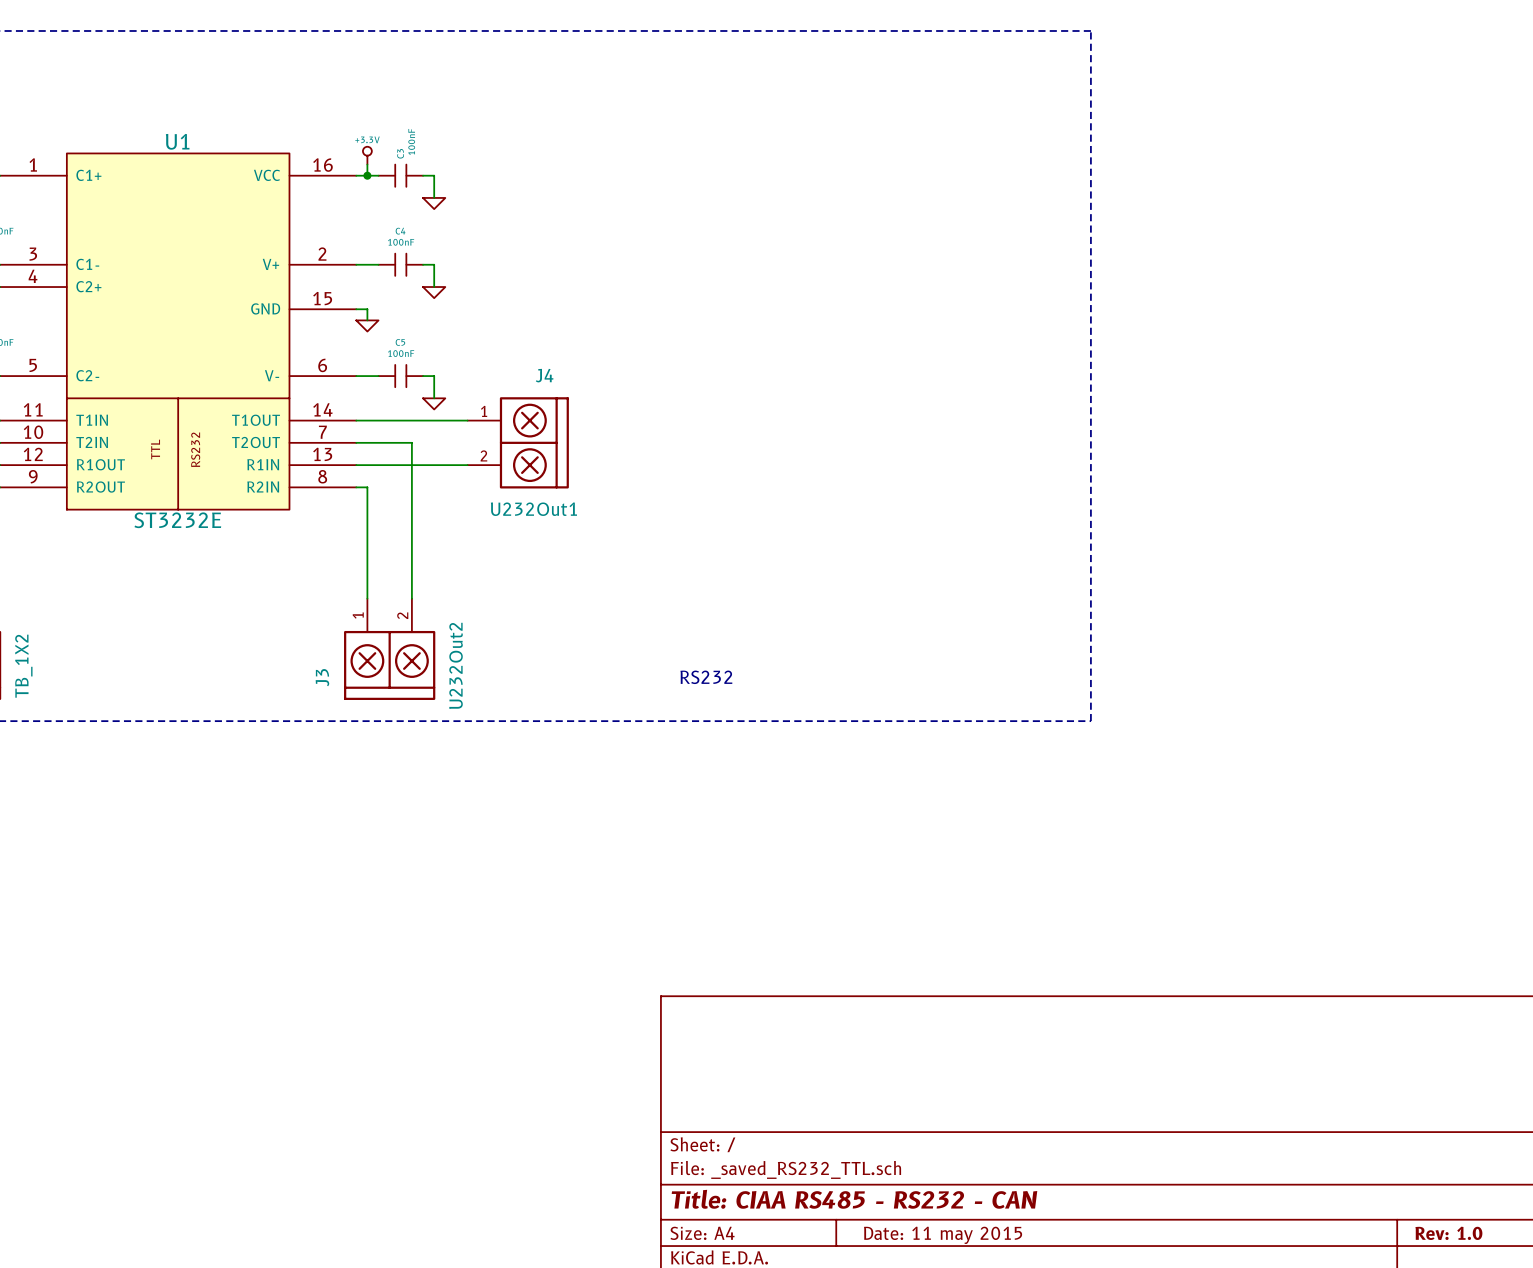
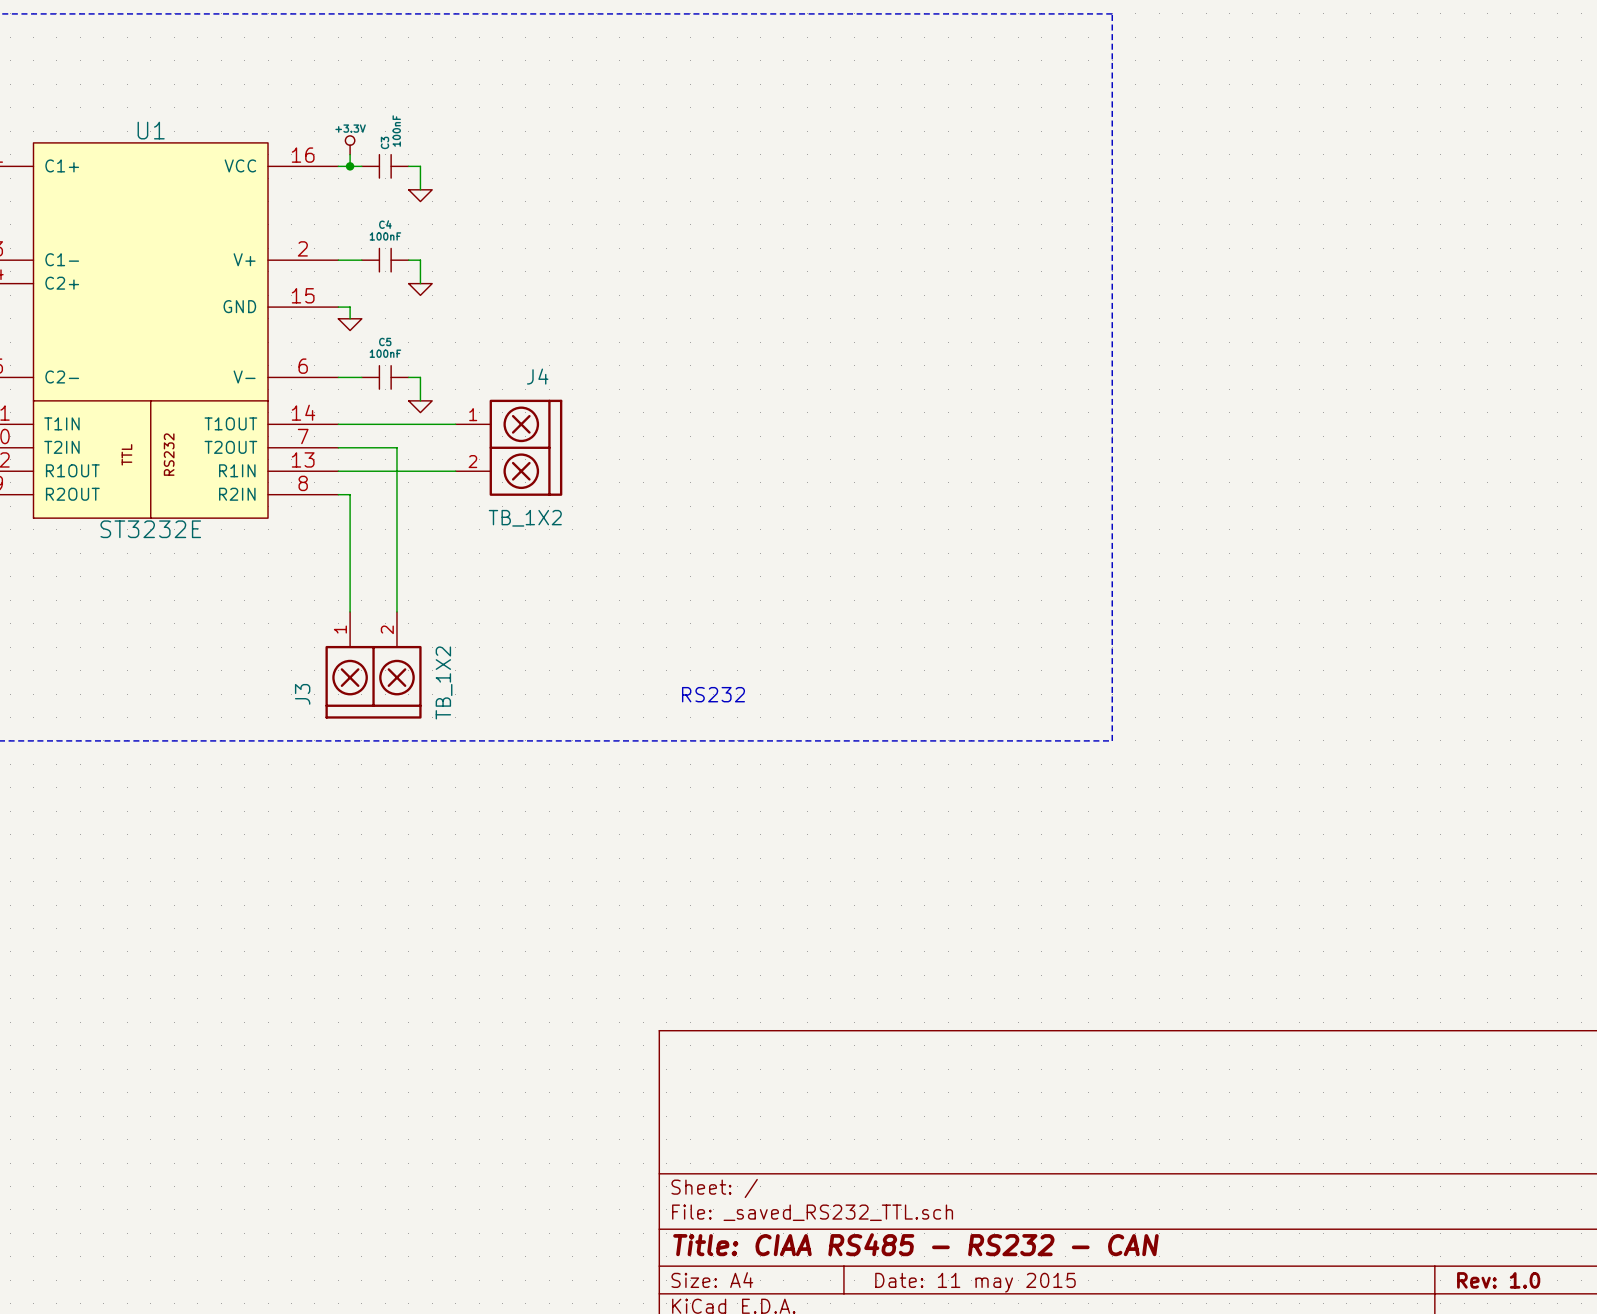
J4 value: U232Out1 (533, 509) -> TB_1X2 (525, 518)
J3 value: U232Out2 (456, 665) -> TB_1X2 (444, 682)

